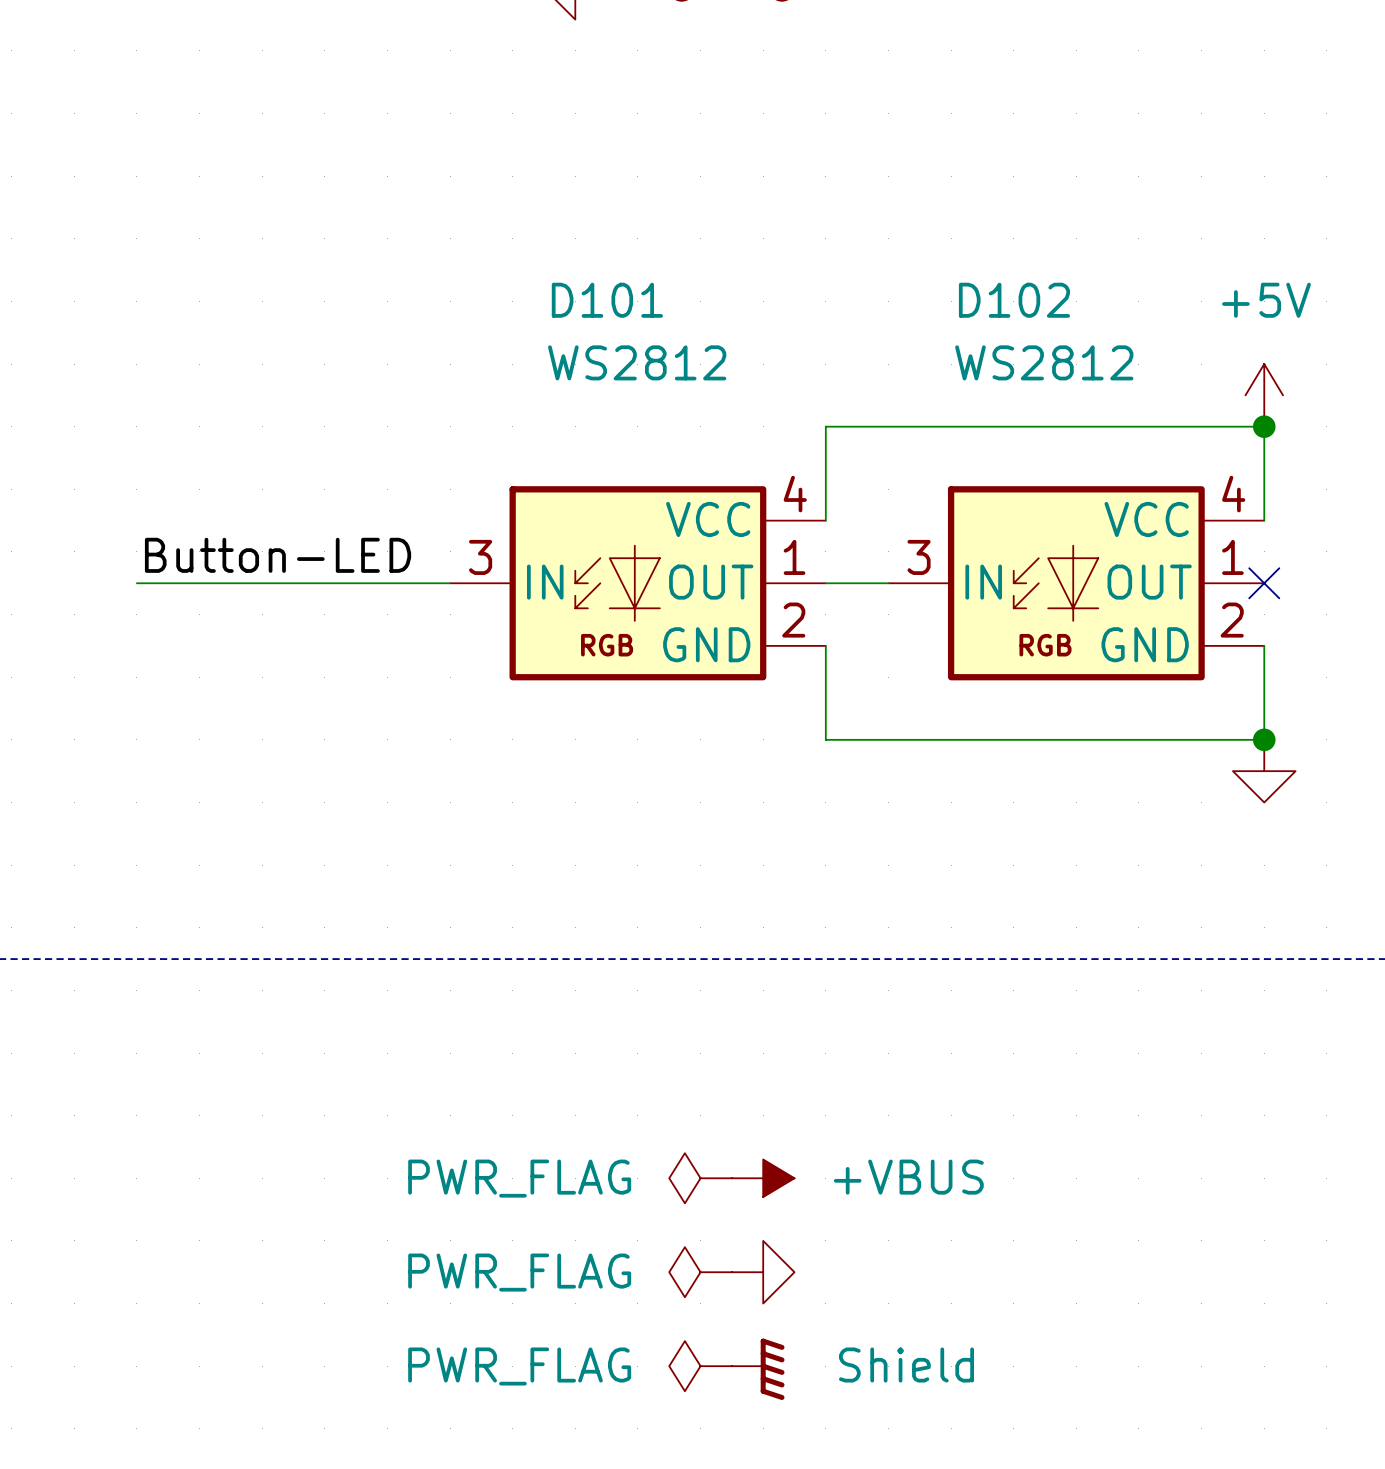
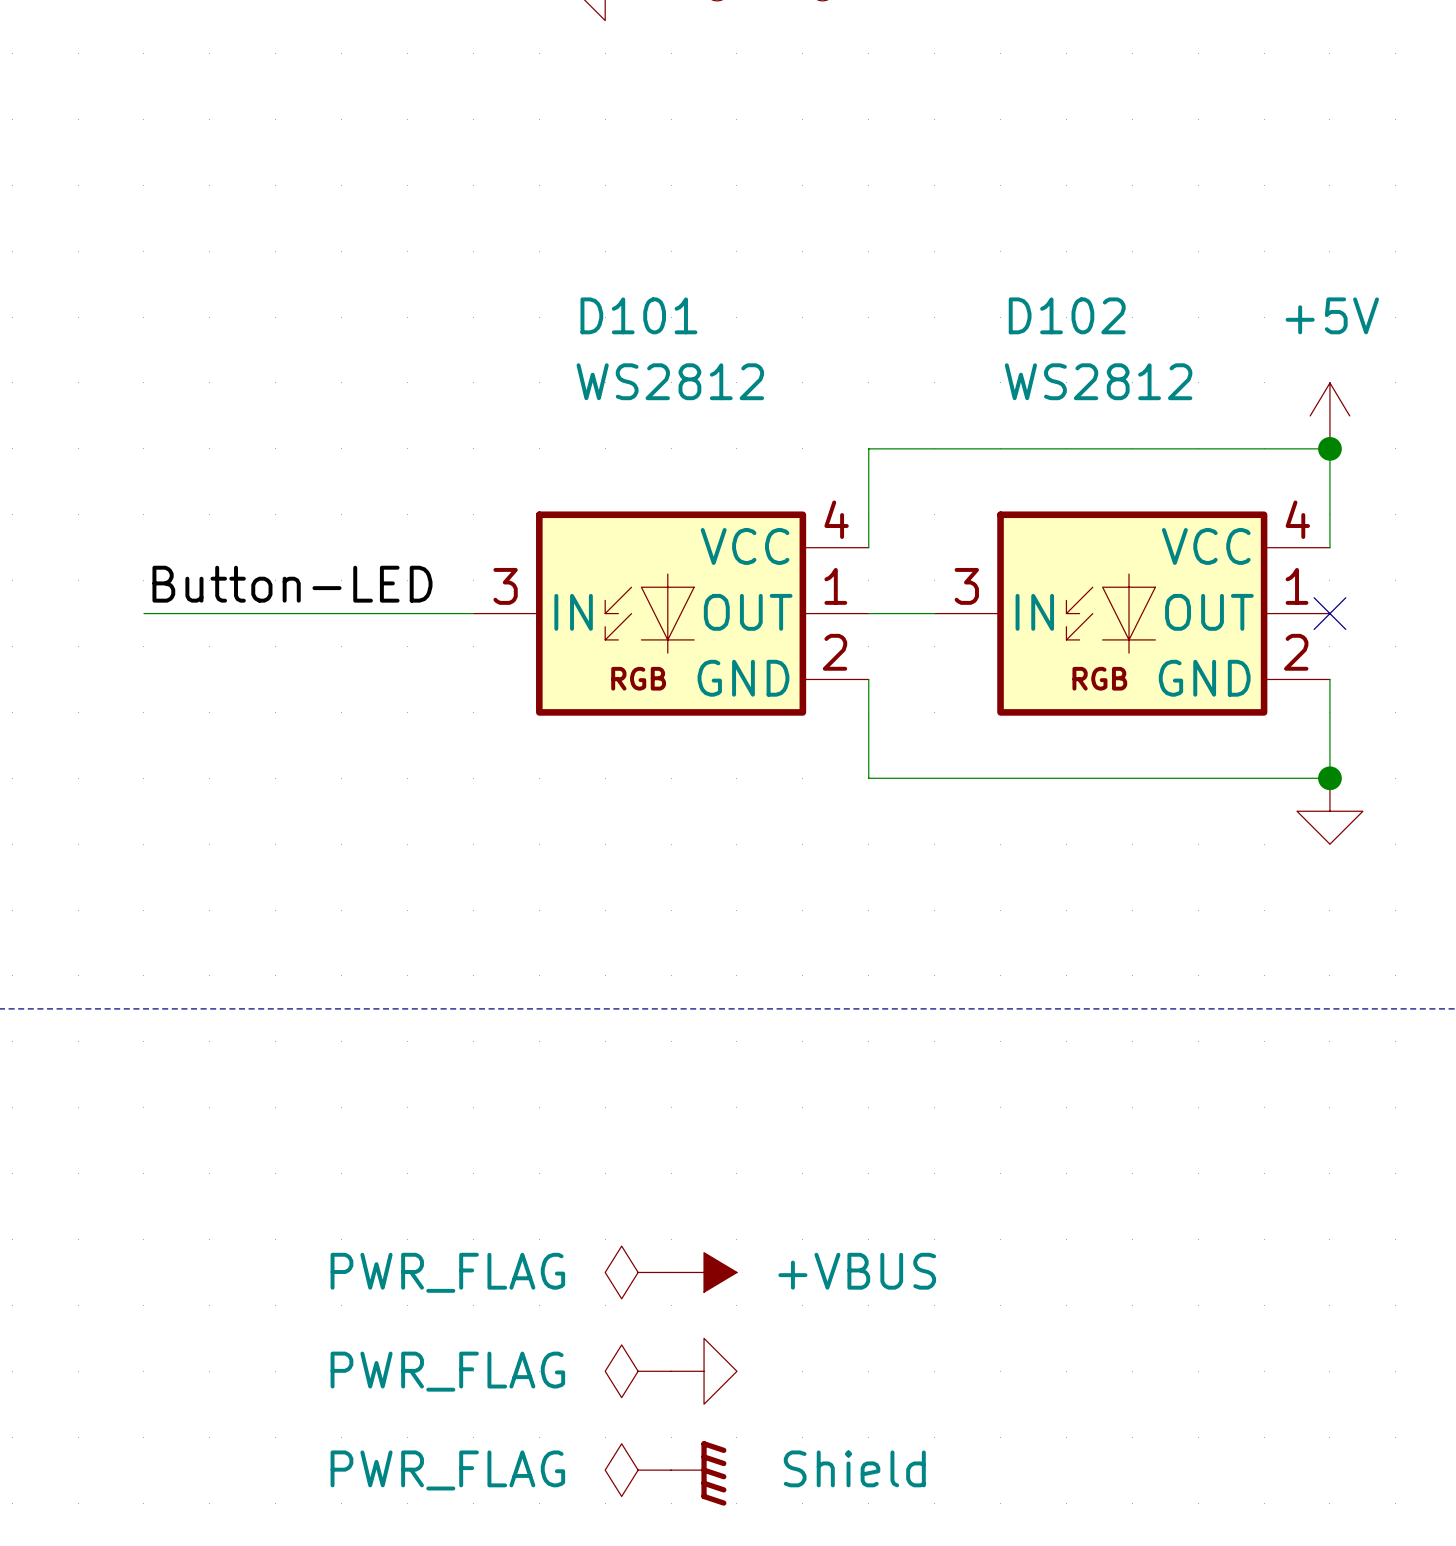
power symbol: PWR_FLAG (700, 1178) -> none
power symbol position: +VBUS (763, 1178) -> +VBUS (704, 1272)
power symbol: none -> PWR_FLAG (638, 1272)
power symbol: PWR_FLAG (700, 1272) -> none
power symbol position: (763, 1272) -> (704, 1371)
power symbol: none -> PWR_FLAG (638, 1371)
power symbol: PWR_FLAG (700, 1366) -> none
power symbol position: Shield (758, 1369) -> Shield (698, 1473)
power symbol: none -> PWR_FLAG (638, 1470)

